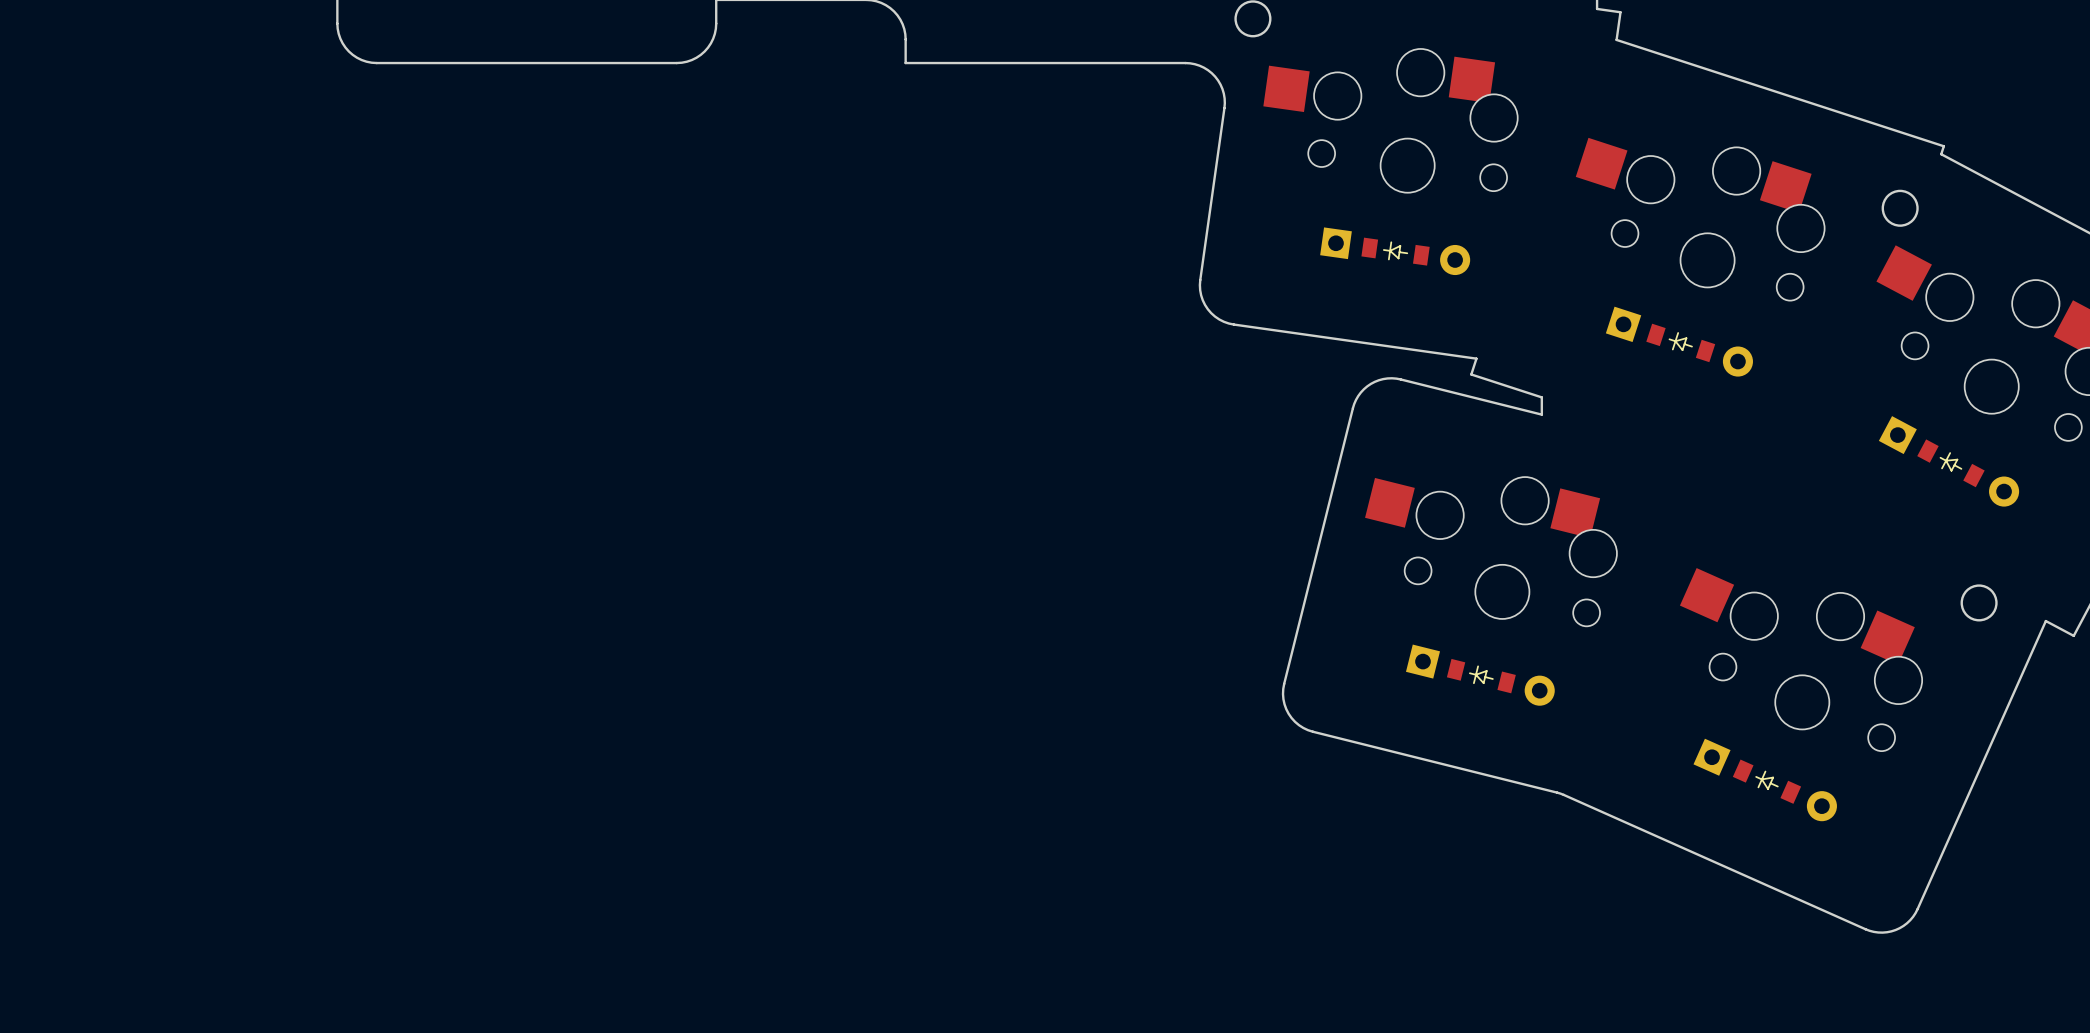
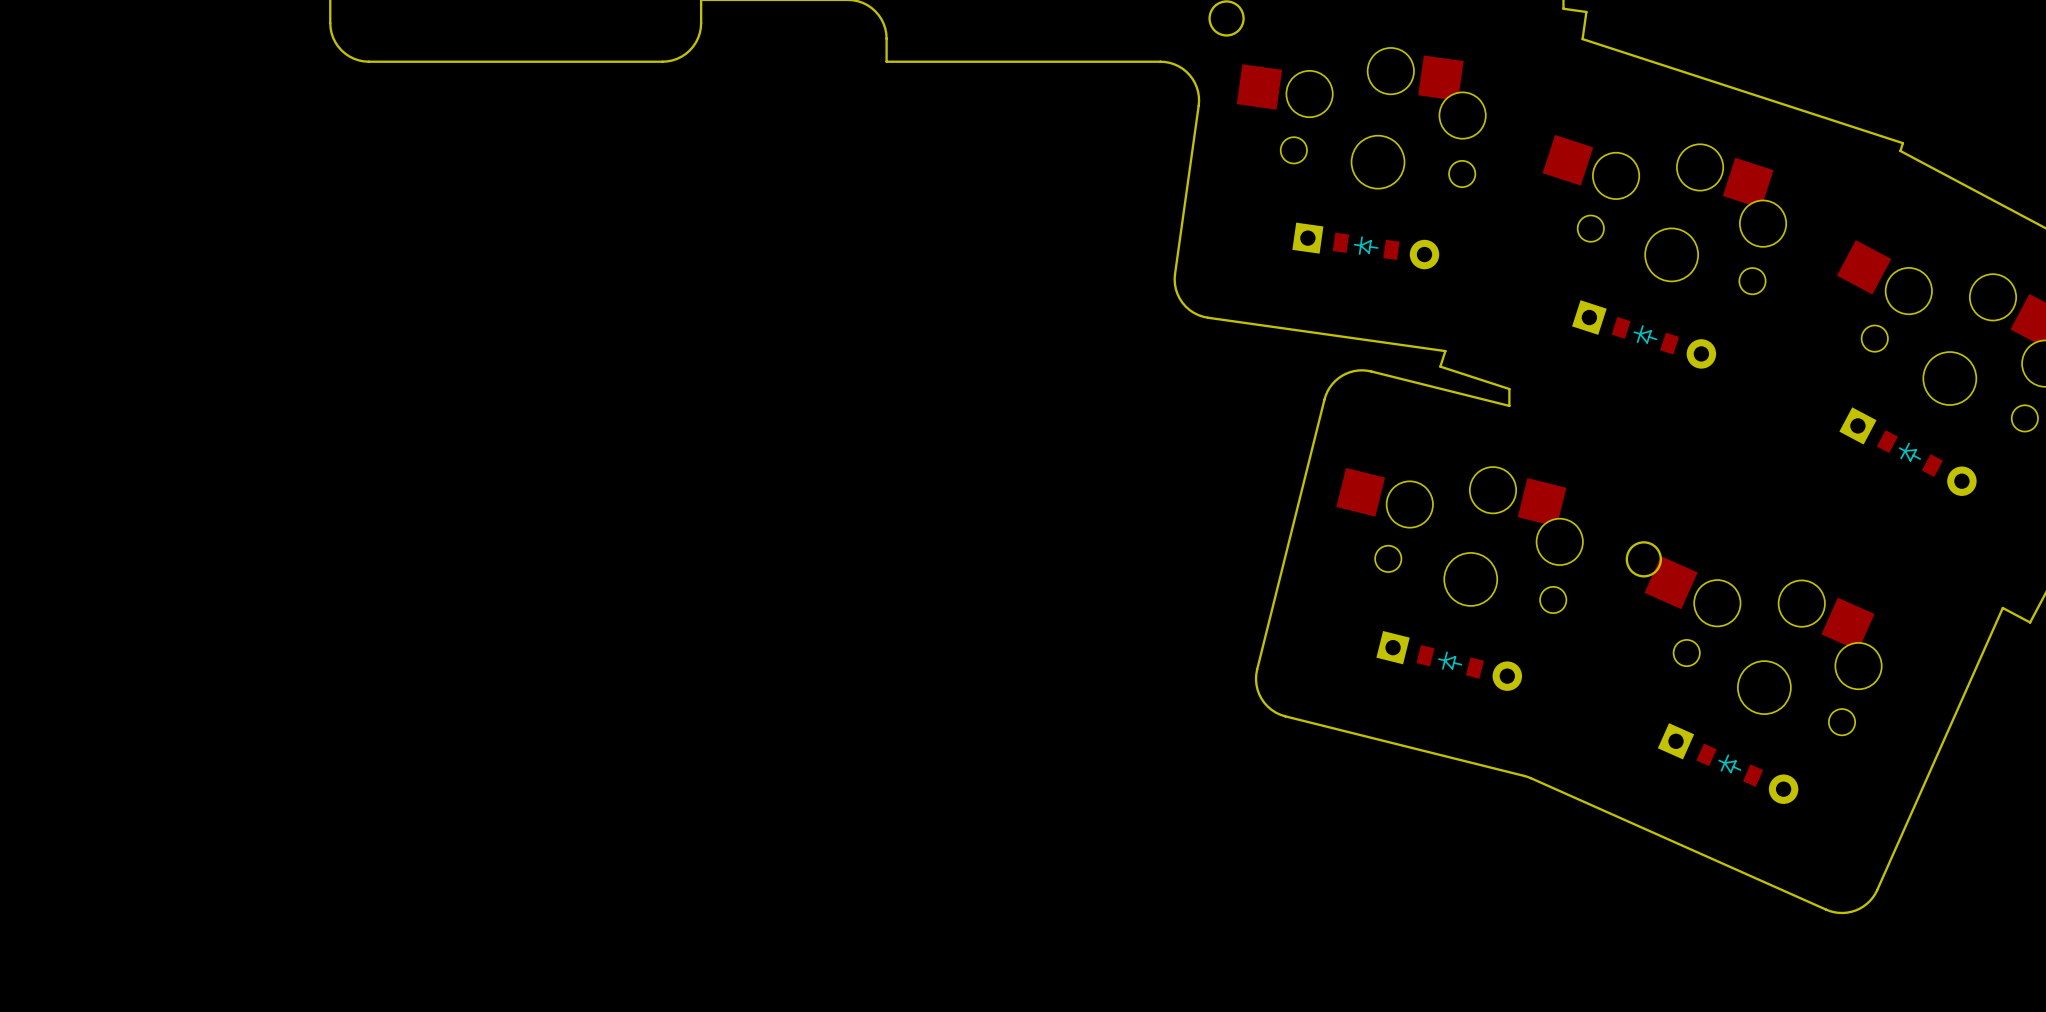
round board edge: [1881, 189, 1919, 227] -> none
round board edge: none -> [1625, 541, 1663, 578]
round board edge: [1960, 584, 1998, 622] -> none

